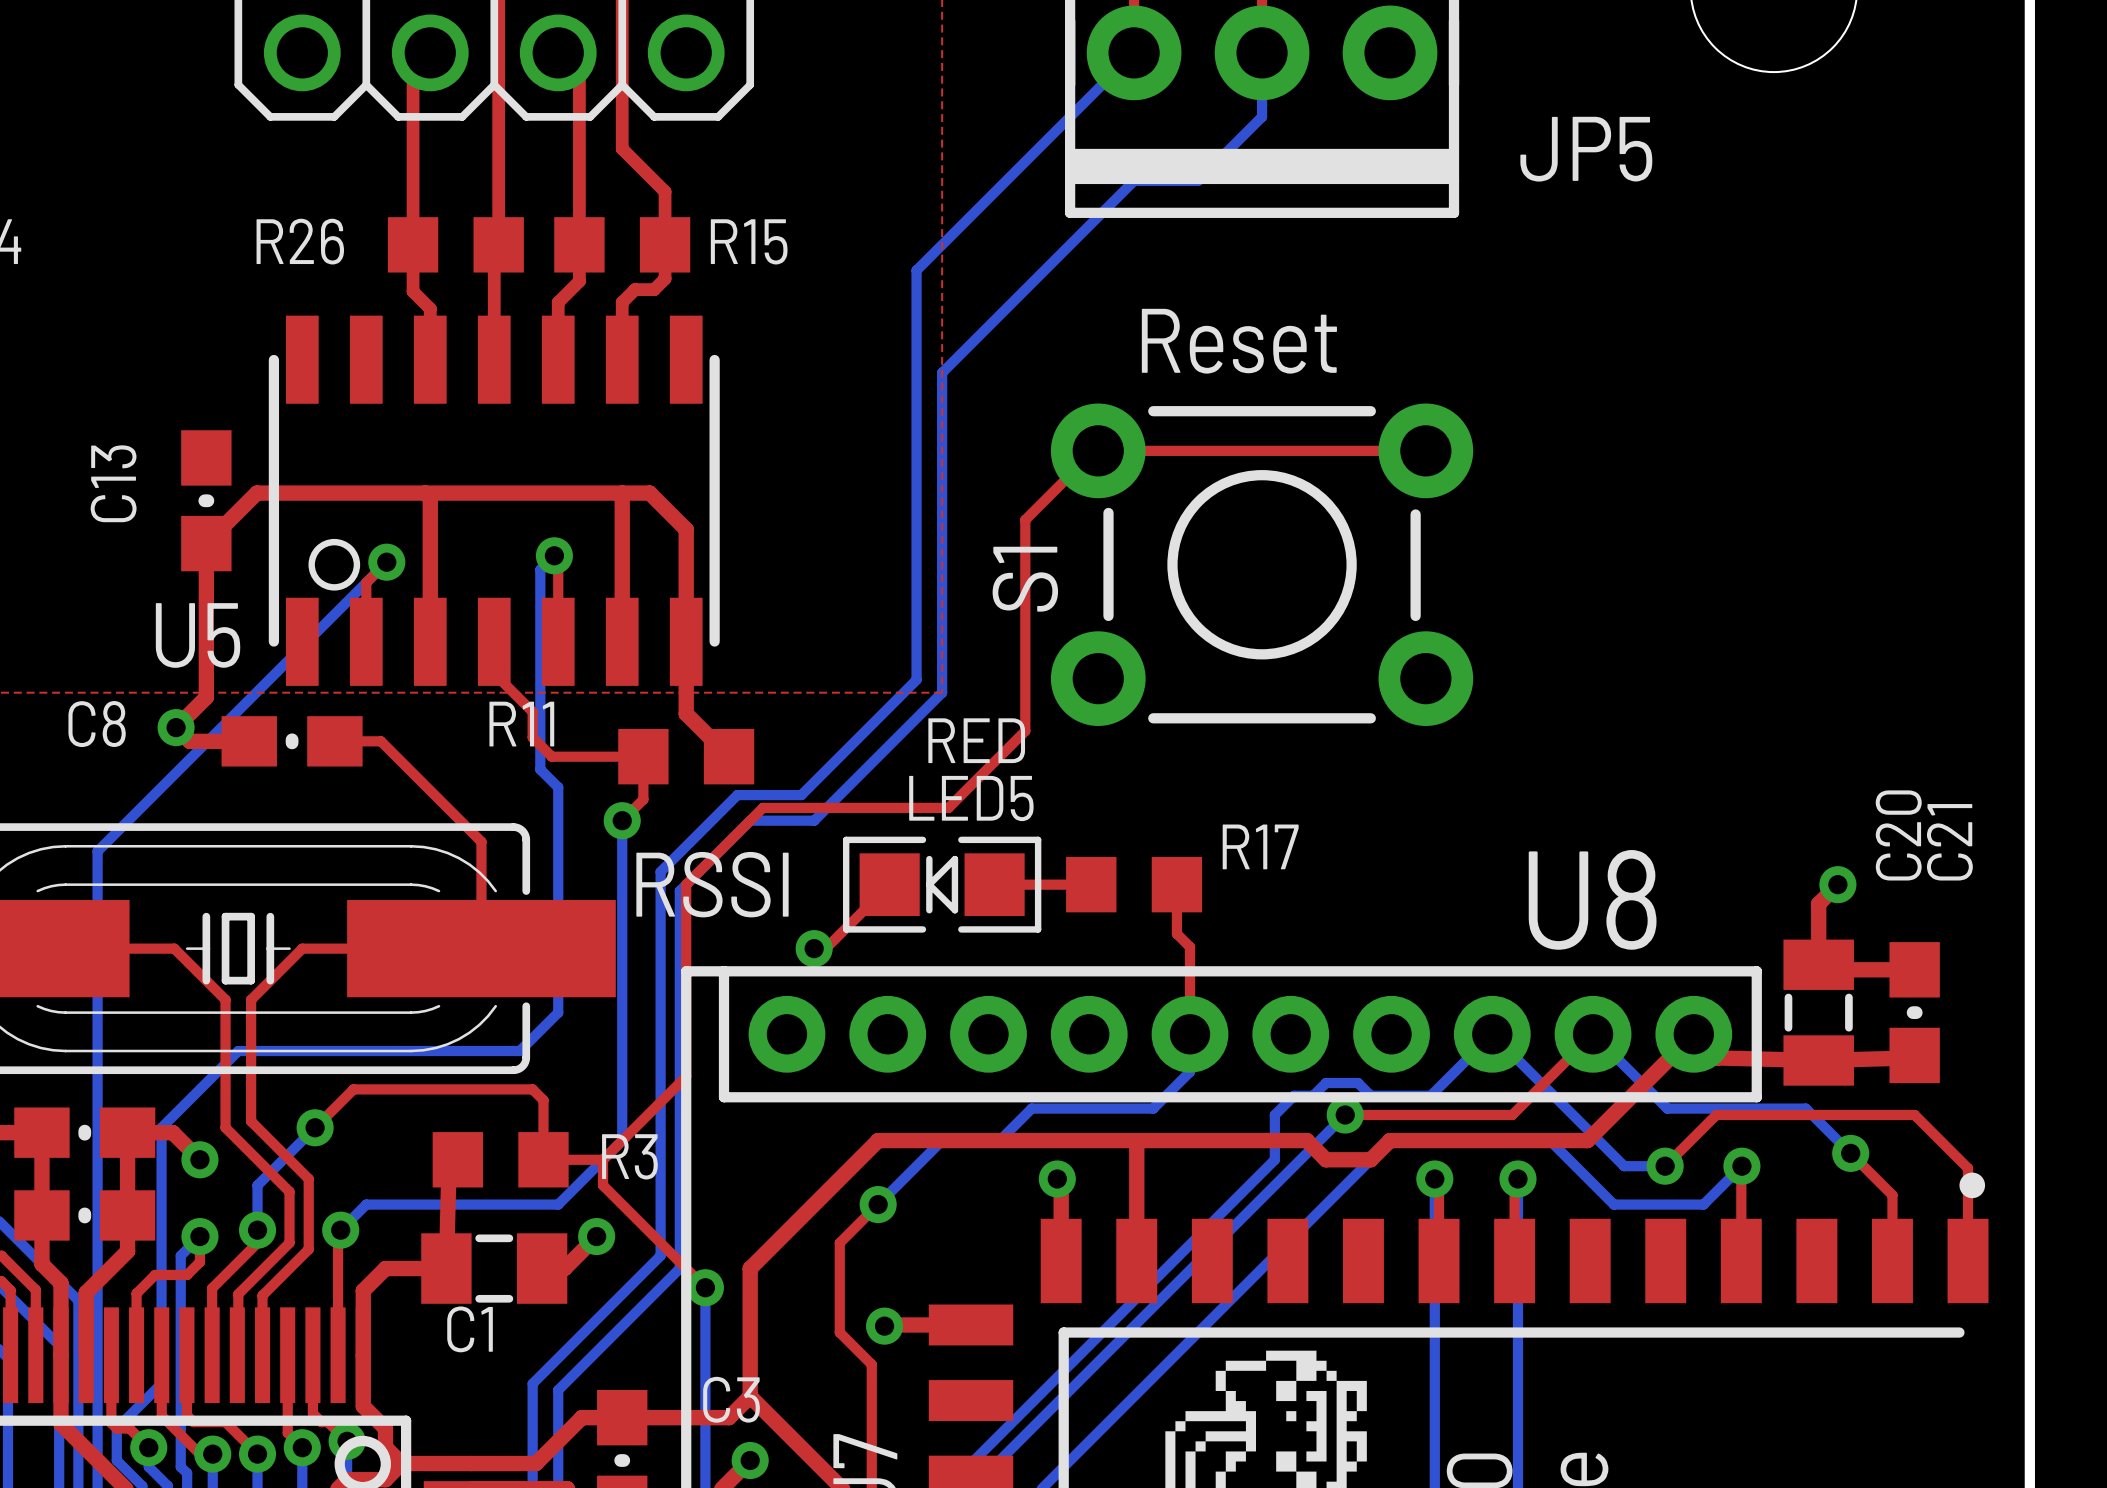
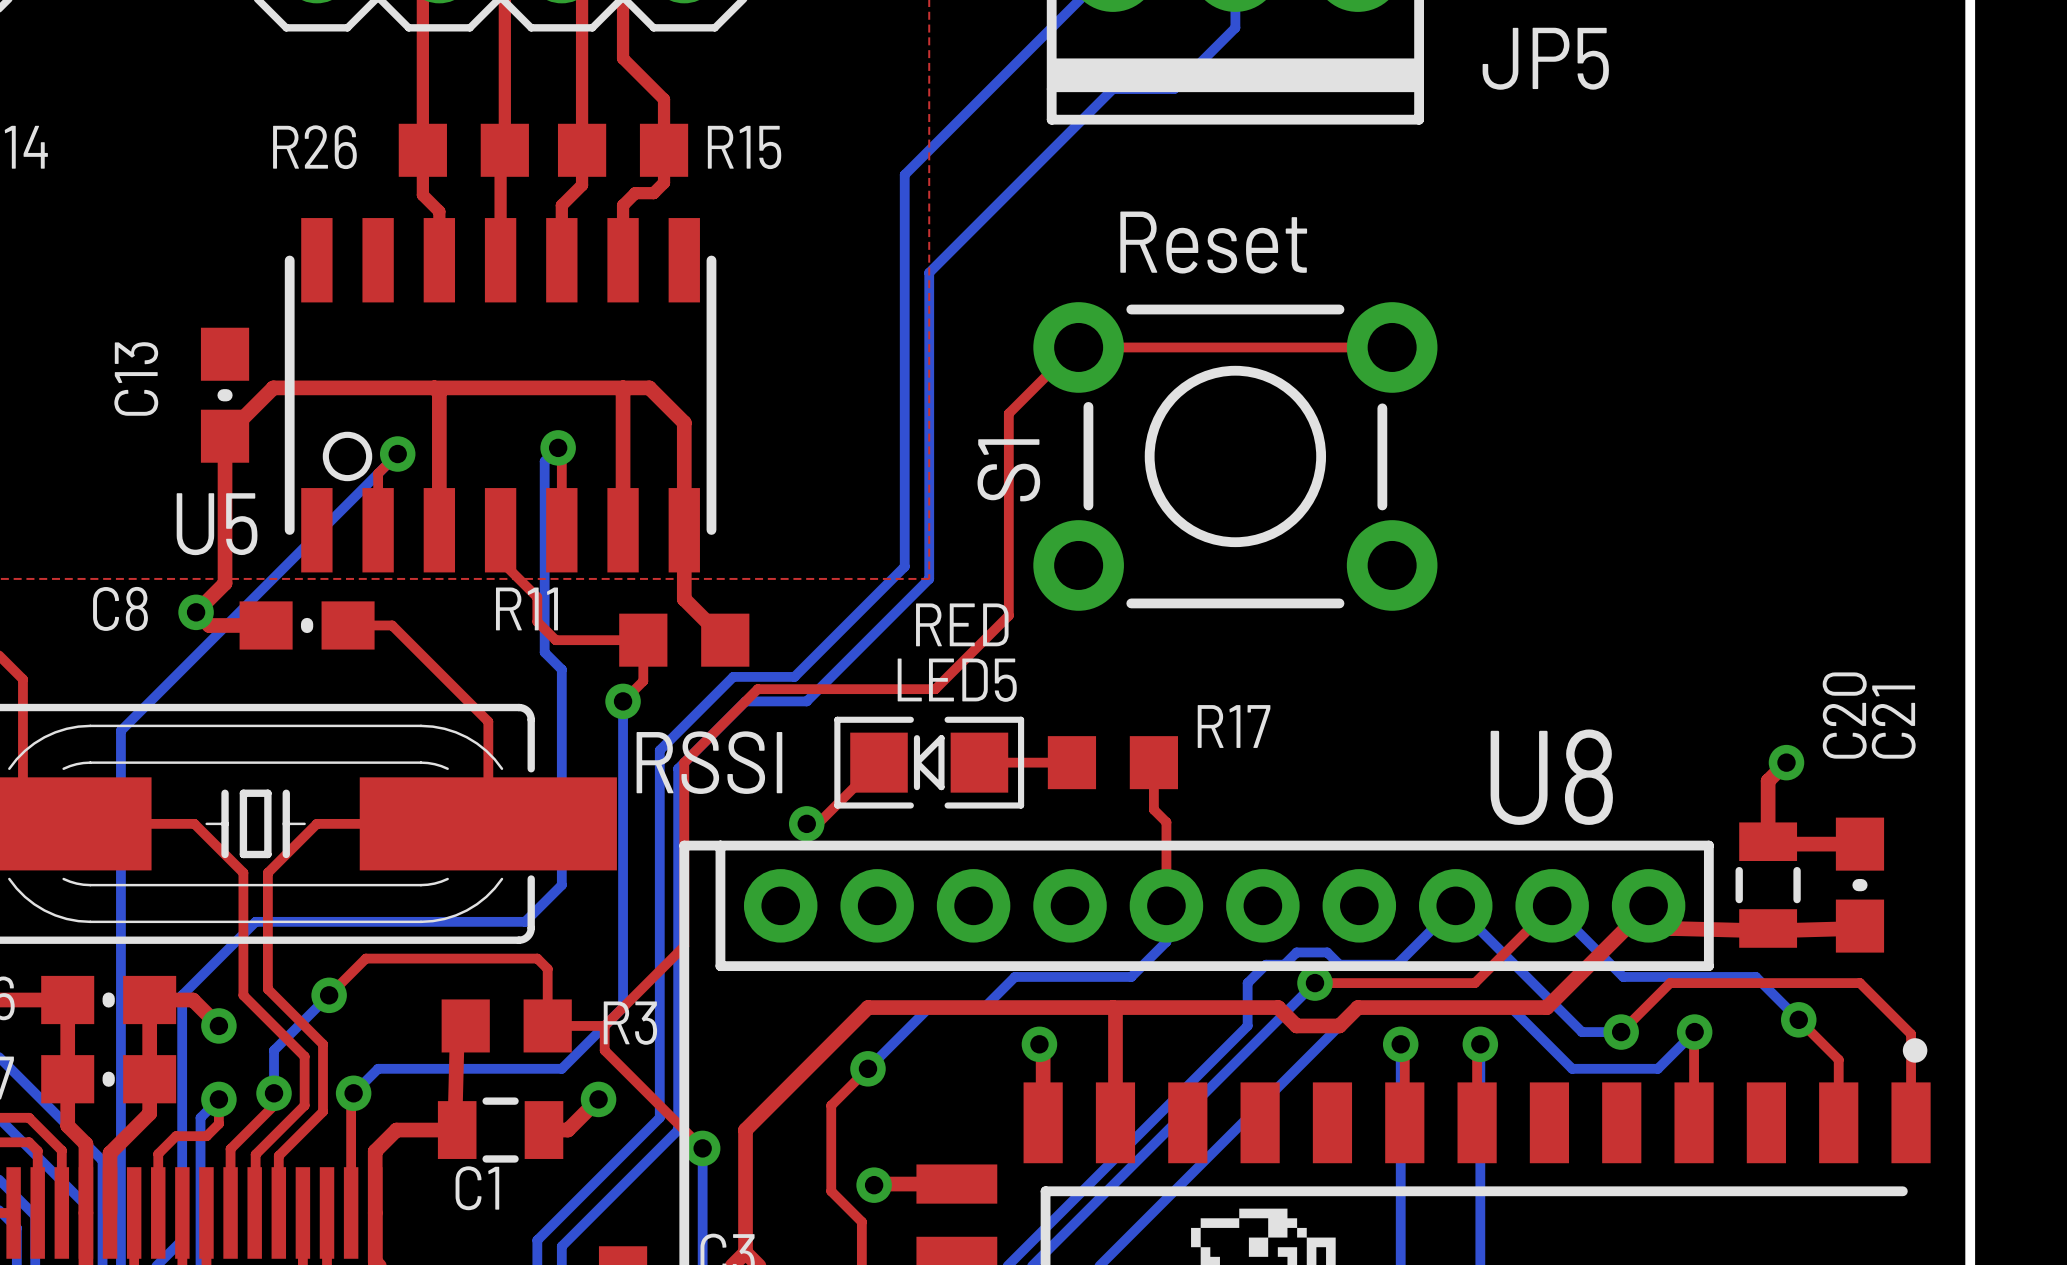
C20 footprint: [1783, 939, 1854, 1086] -> [1735, 822, 1801, 948]
C1 footprint: [421, 1233, 568, 1304] -> [437, 1097, 564, 1163]

